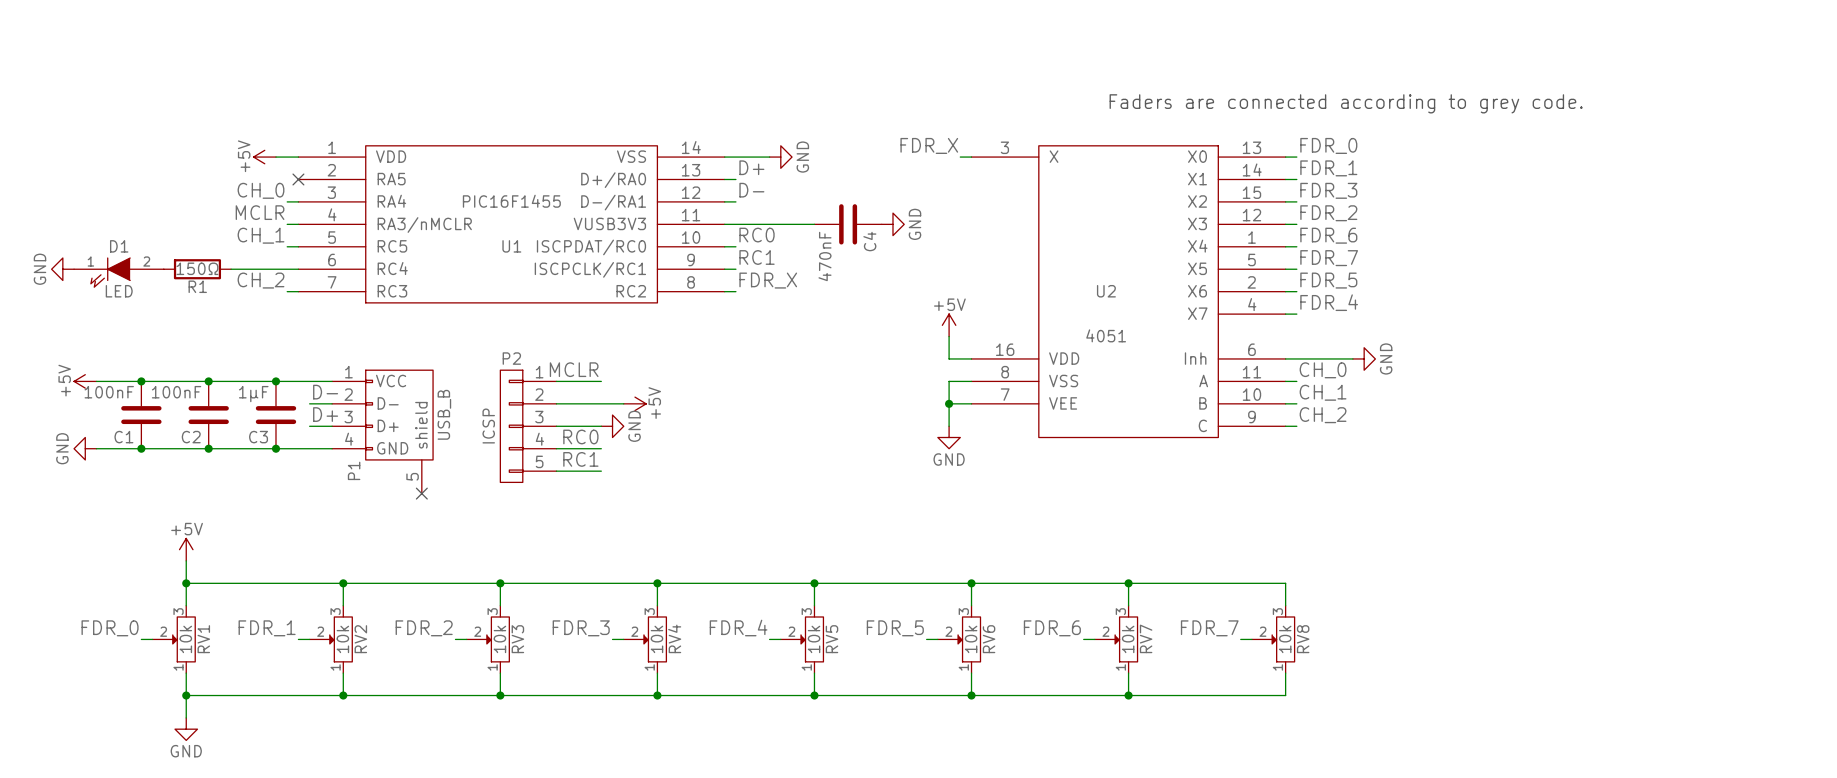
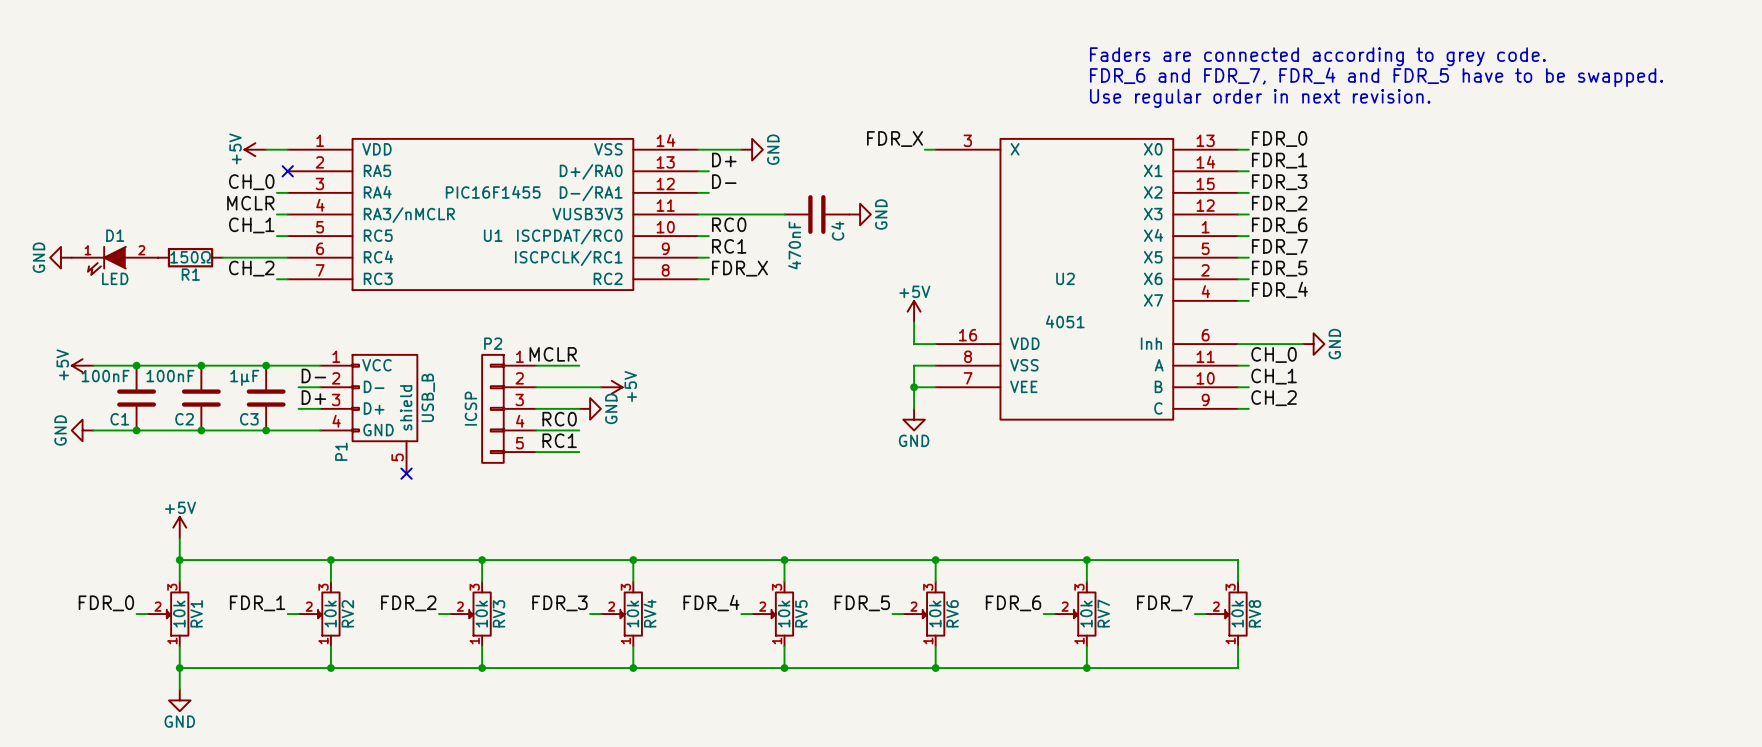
text: none -> FDR_6 and FDR_7, FDR_4 and FDR_5 have to be swapped. (1376, 77)
text: none -> Use regular order in next revision. (1260, 98)
text position: Faders are connected according to grey code. (1346, 103) -> Faders are connected according to grey code. (1317, 56)

